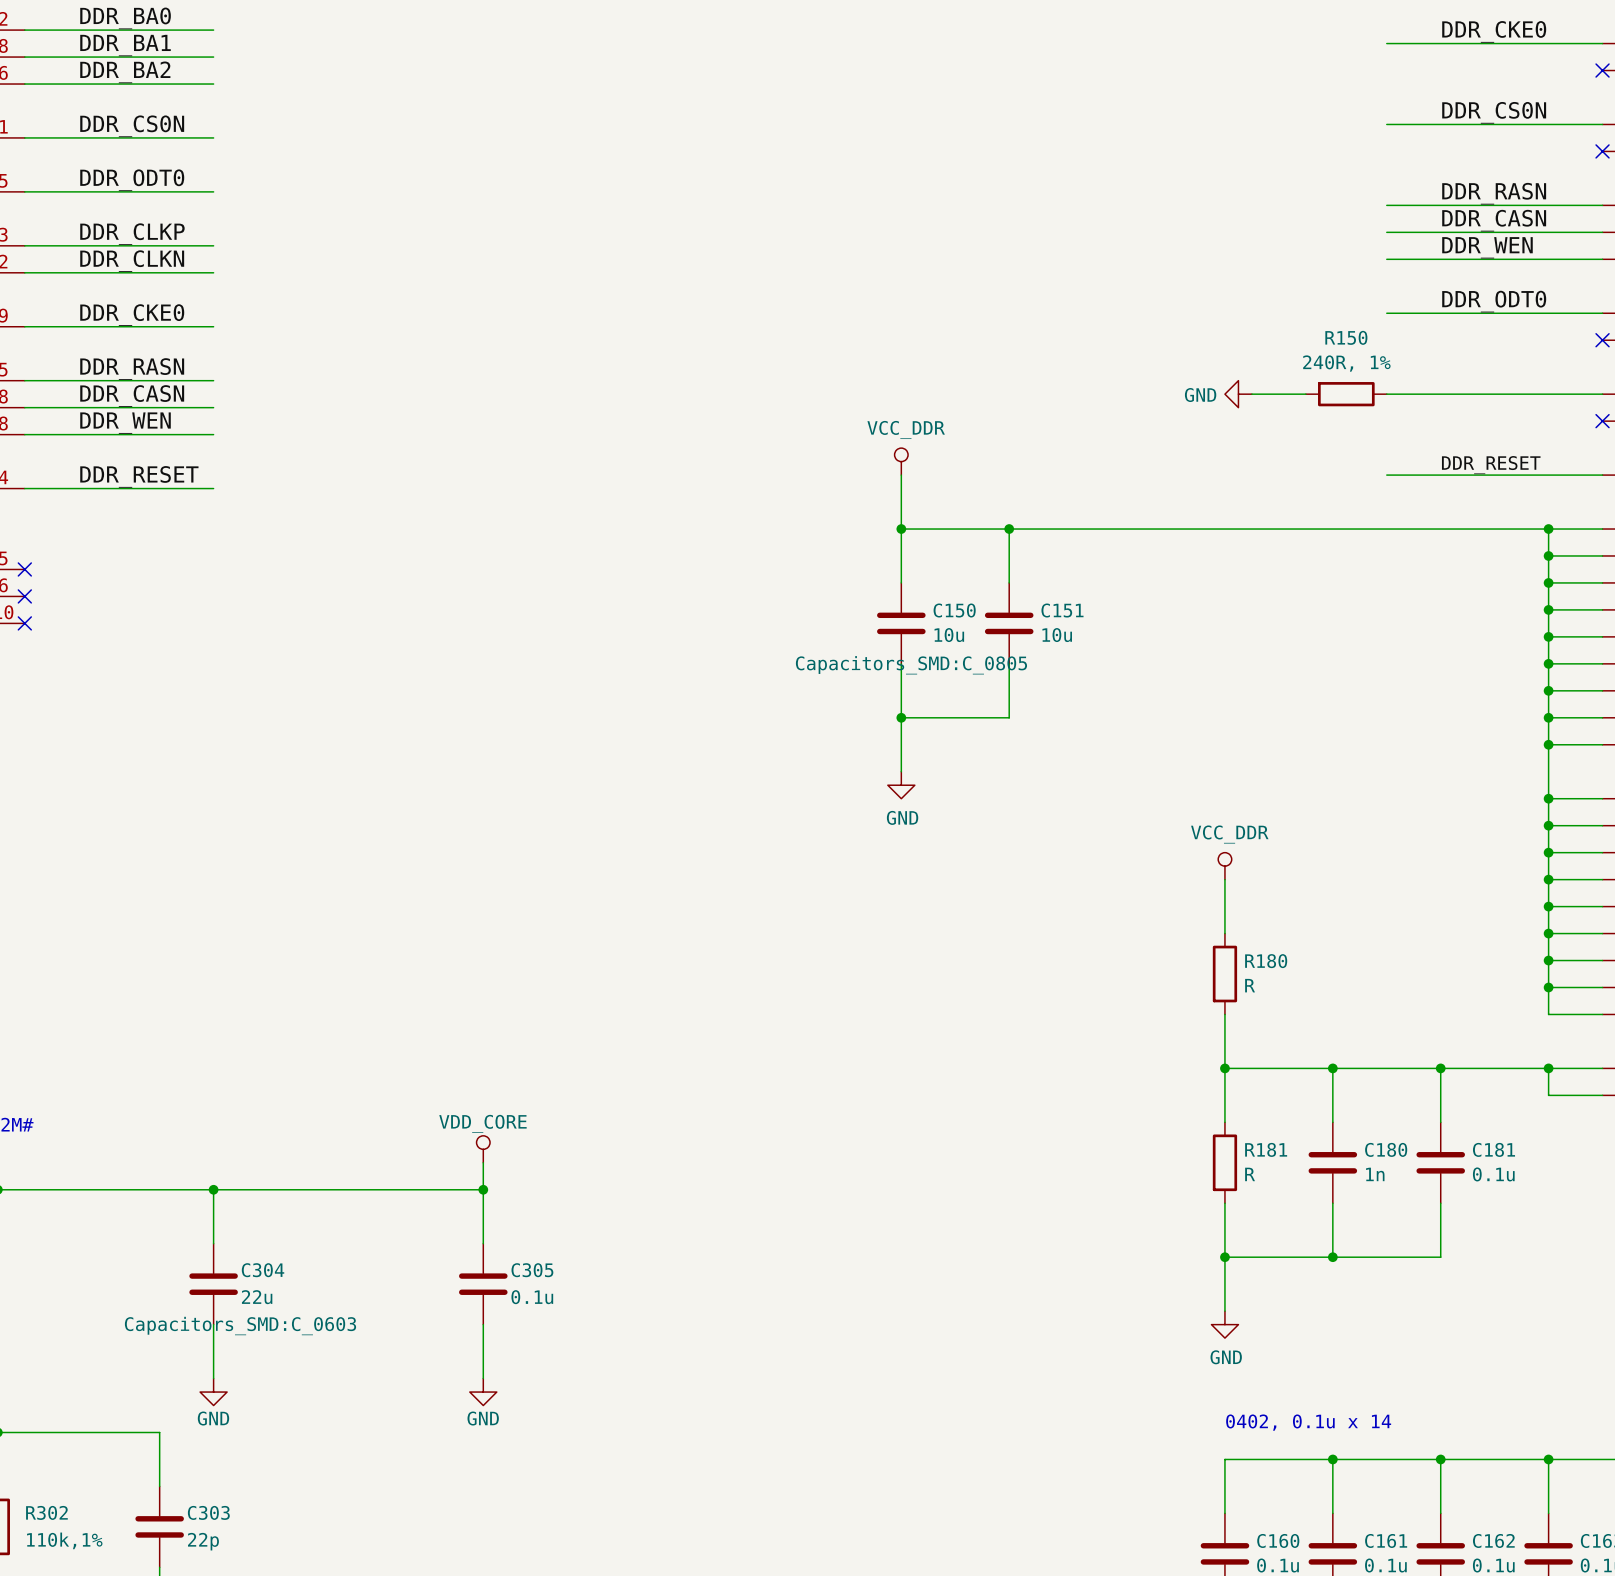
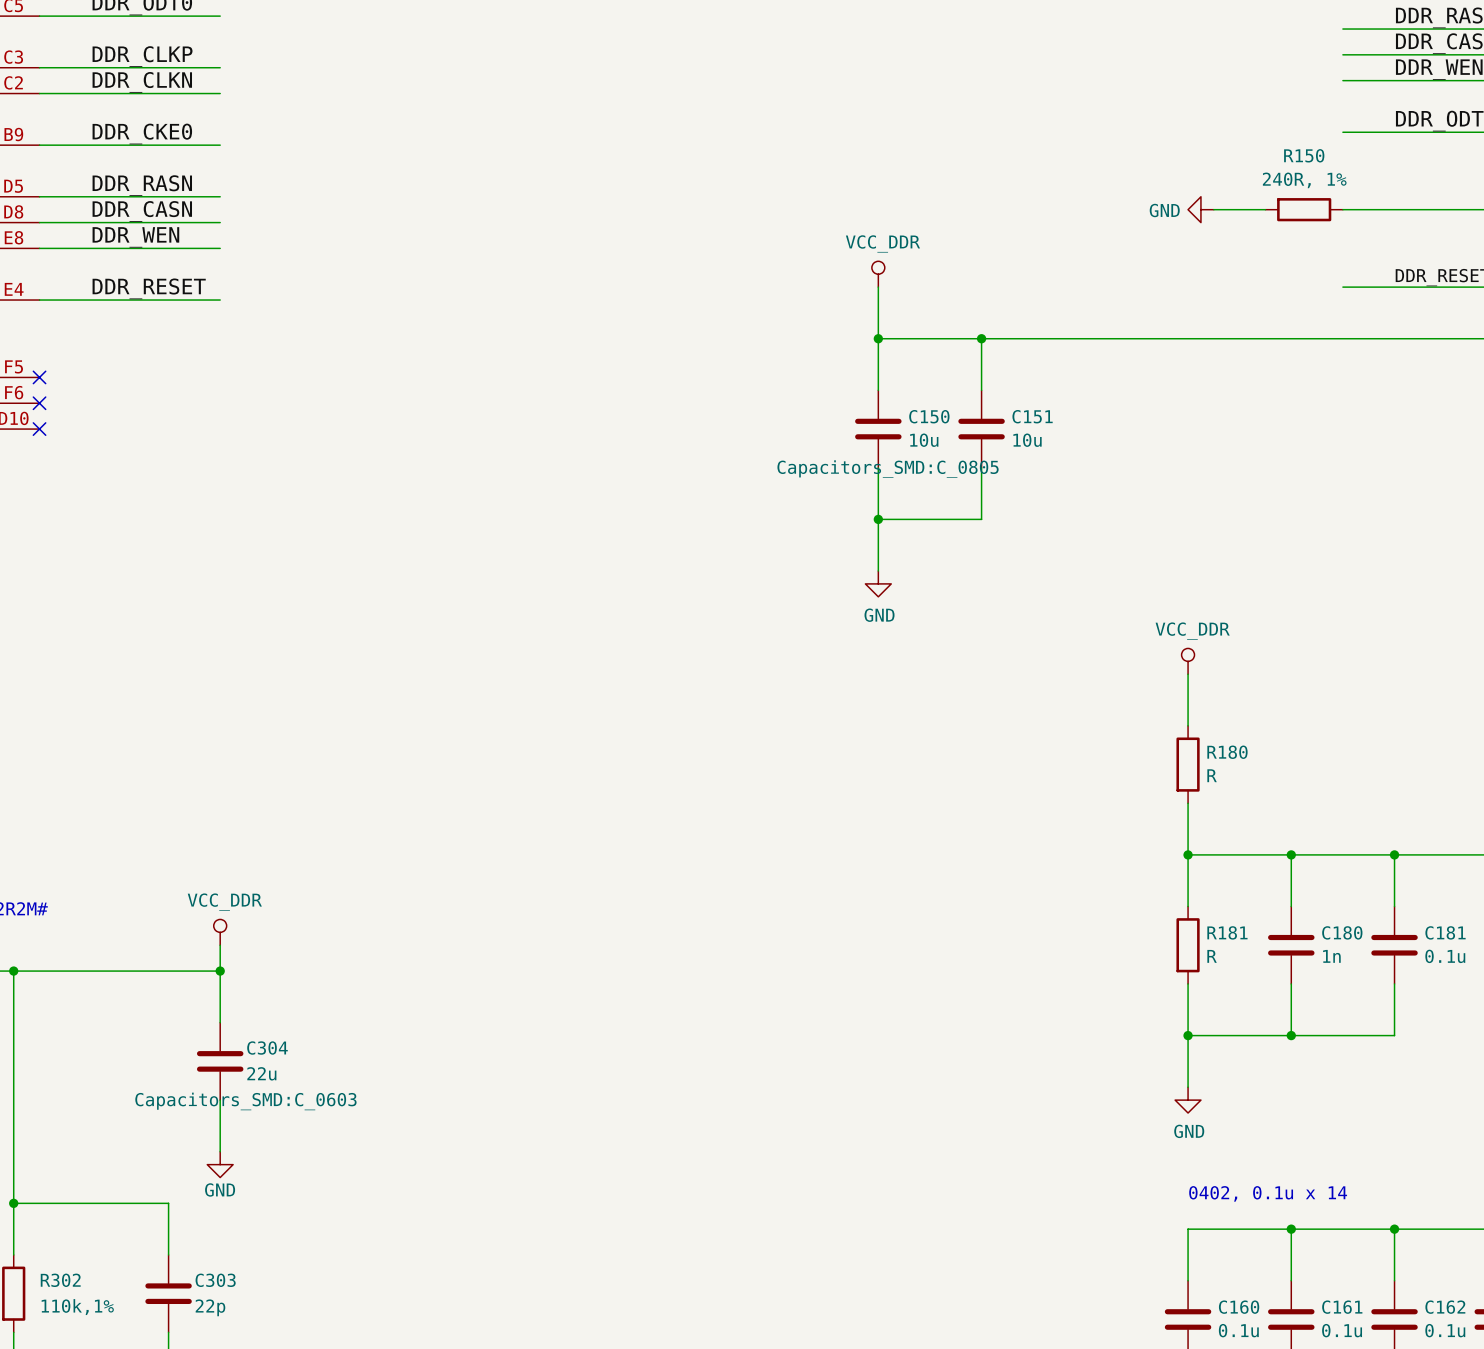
power symbol: none -> VCC_DDR (220, 932)
power symbol: VDD_CORE (483, 1149) -> none
wire: (483, 1162) (483, 1243) -> none
wire: (213, 1189) (483, 1189) -> (220, 971) (220, 945)
junction: (483, 1189) -> none
C305: 0.1u (483, 1284) -> none
wire: (483, 1324) (483, 1378) -> none
power symbol: GND (483, 1392) -> none

